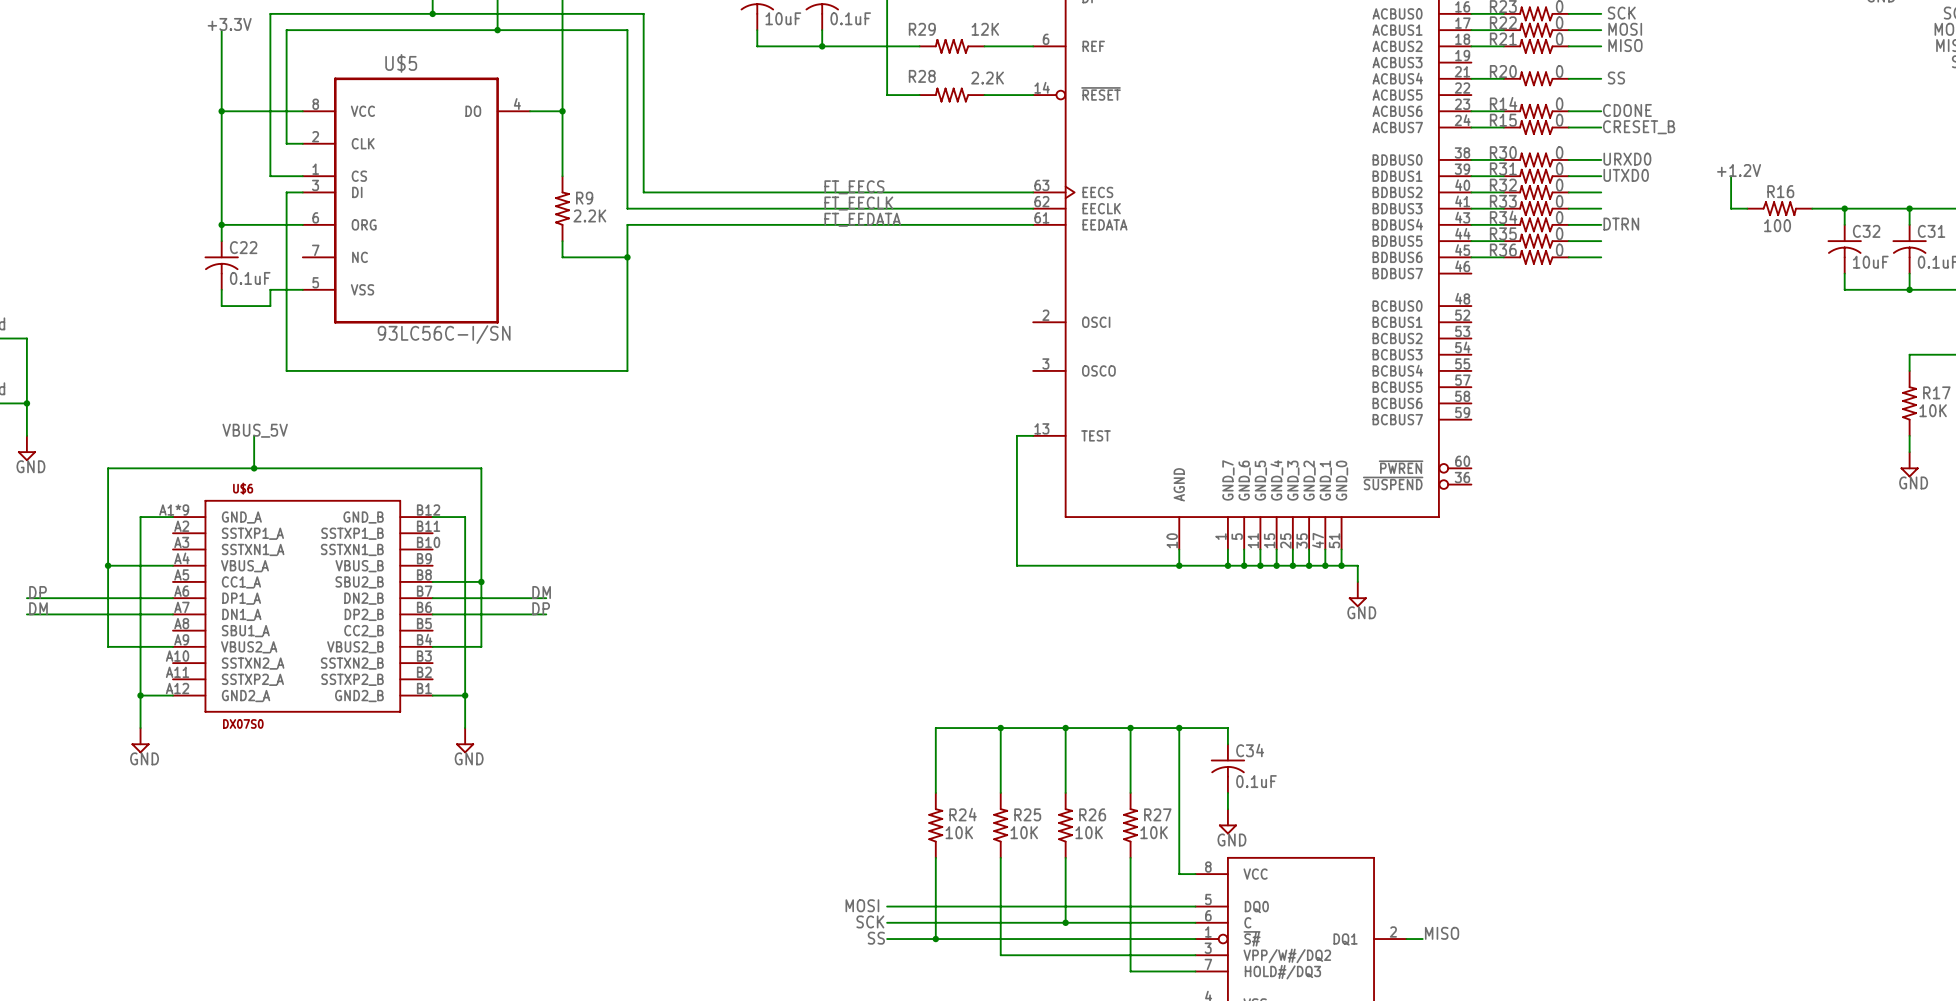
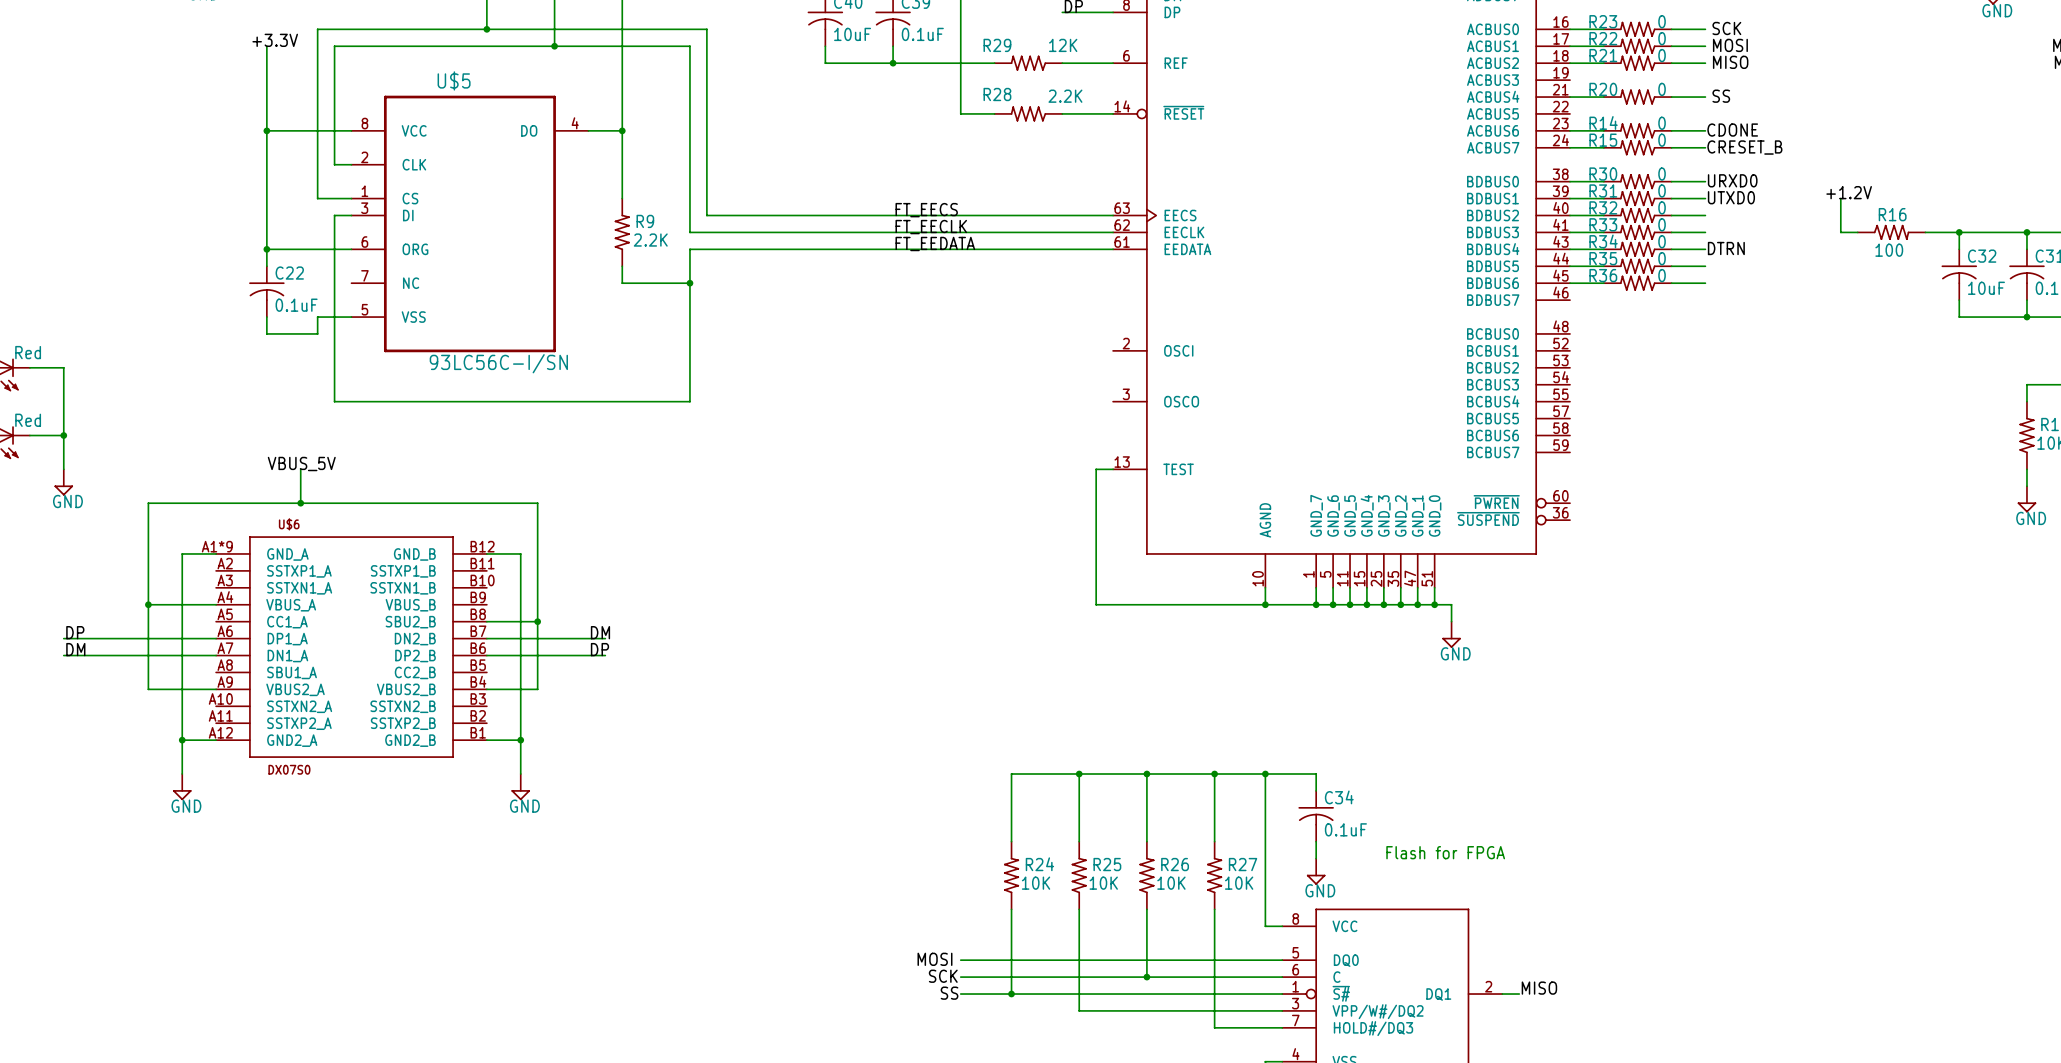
text: none -> Flash for FPGA (1445, 852)

